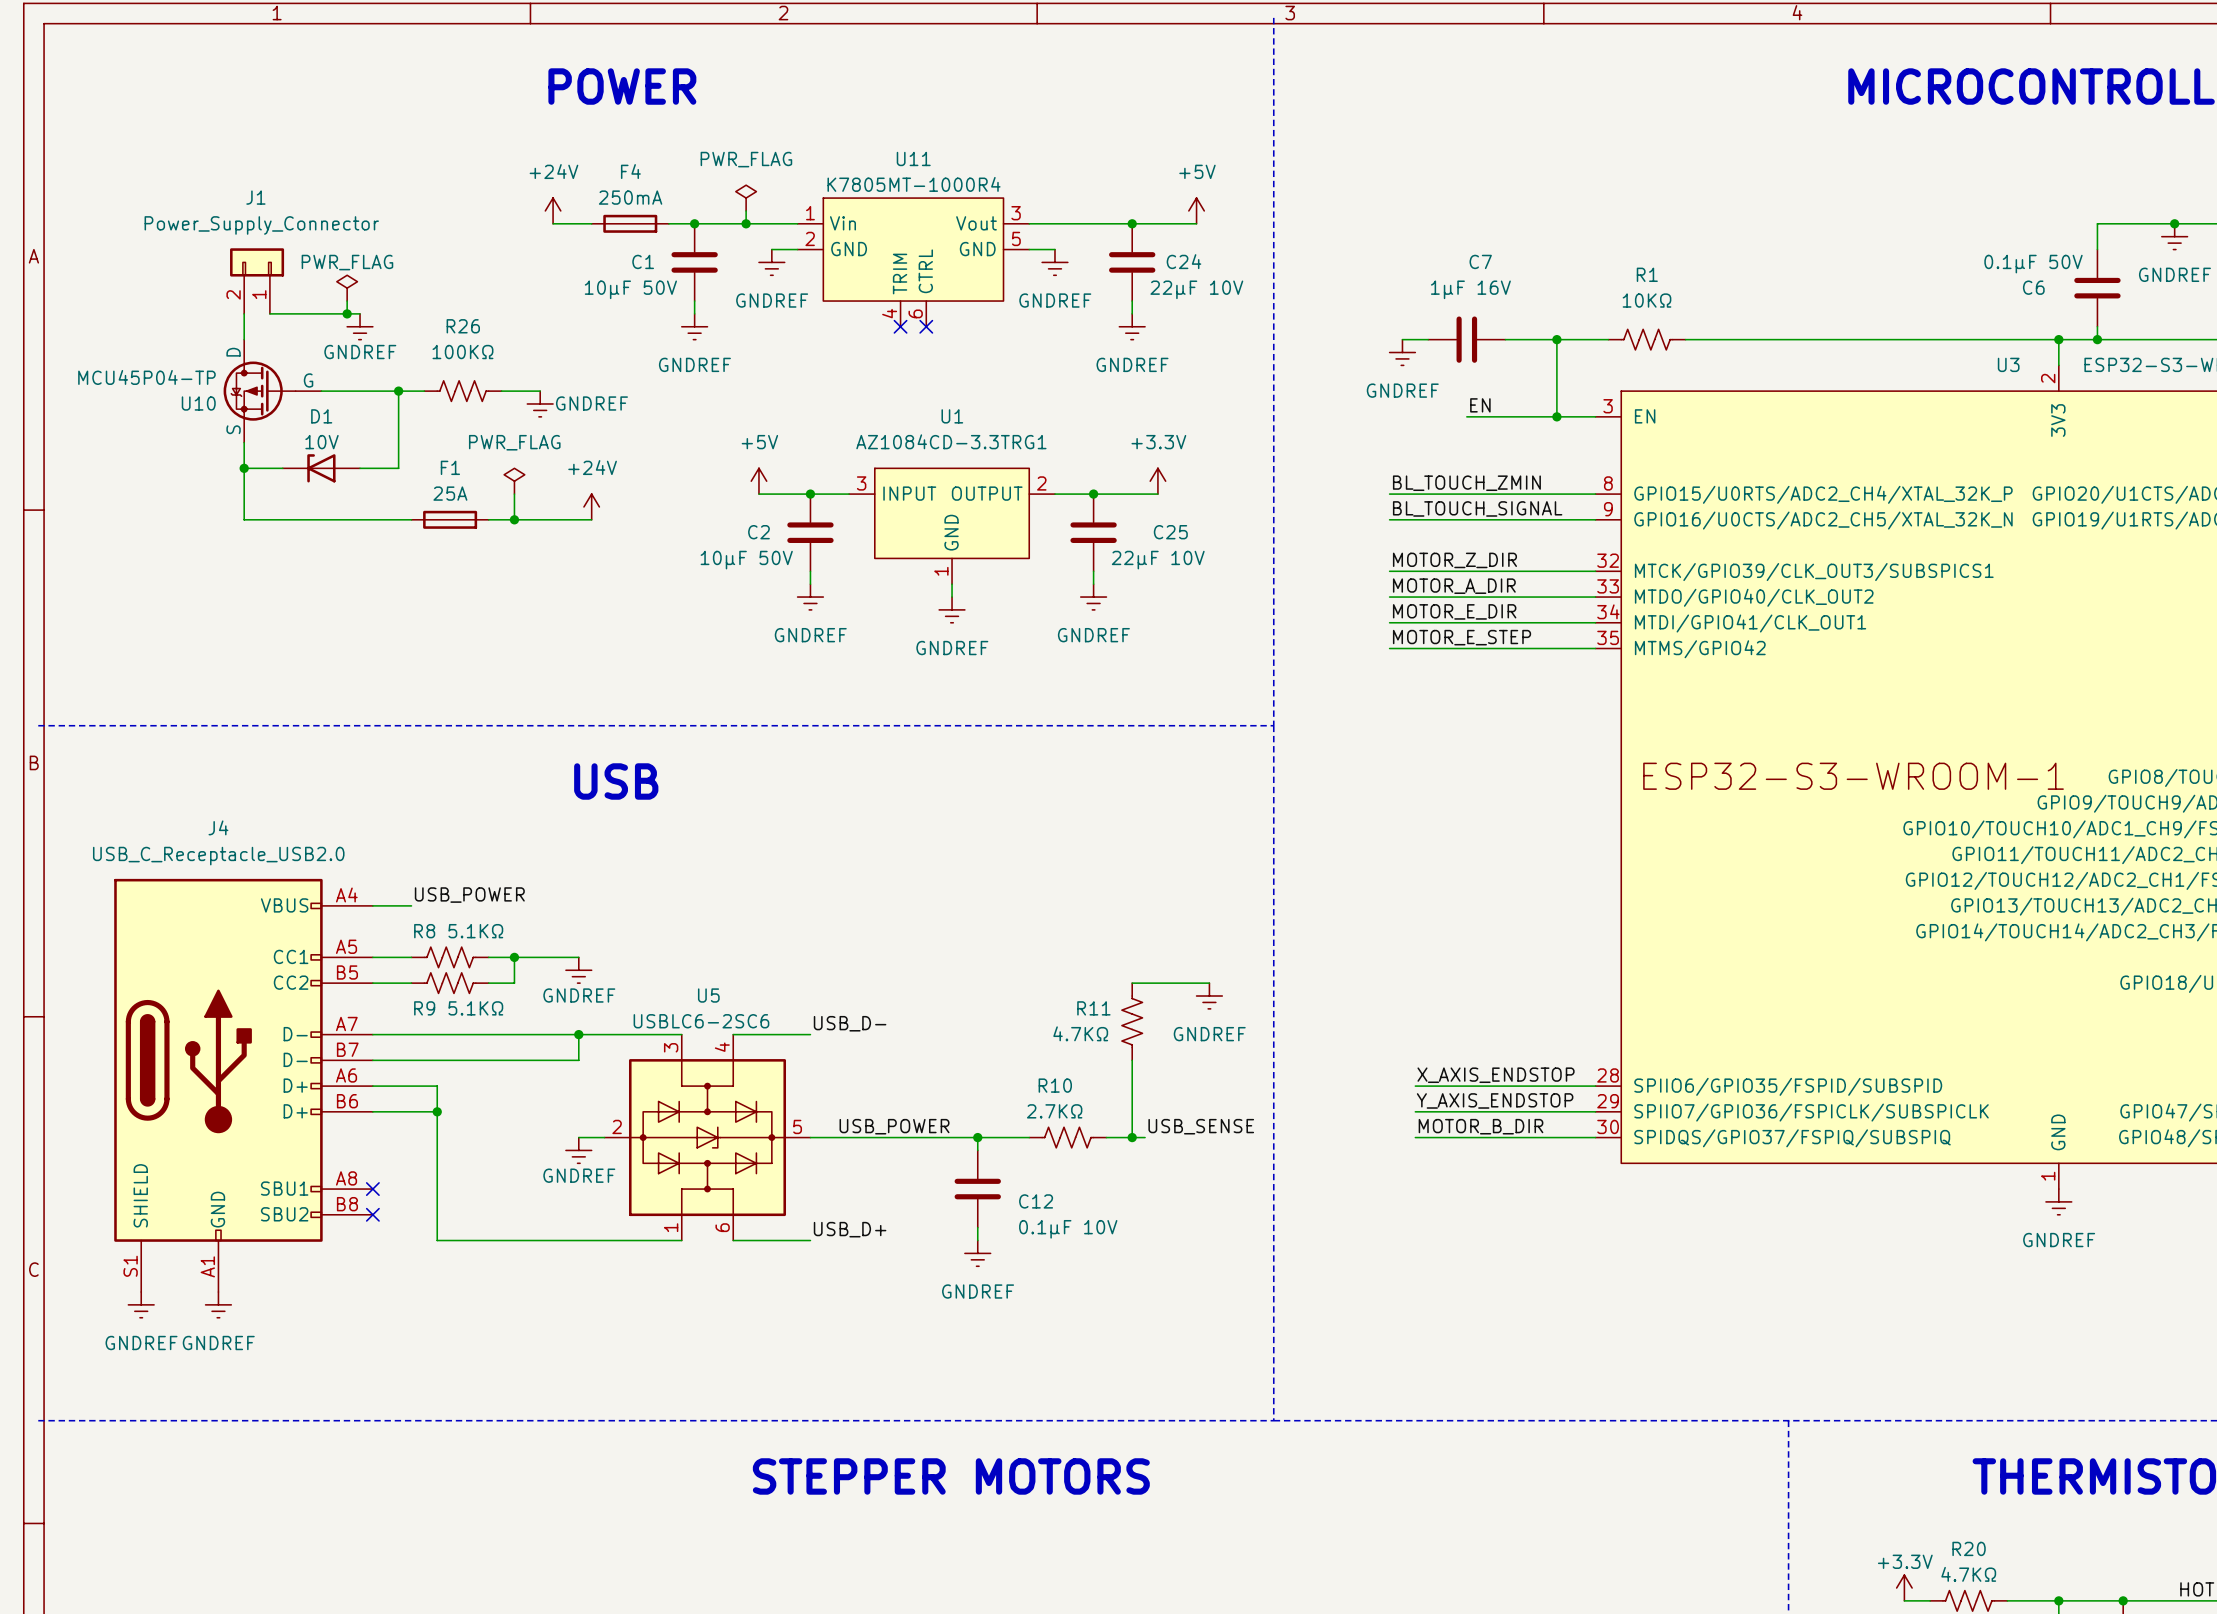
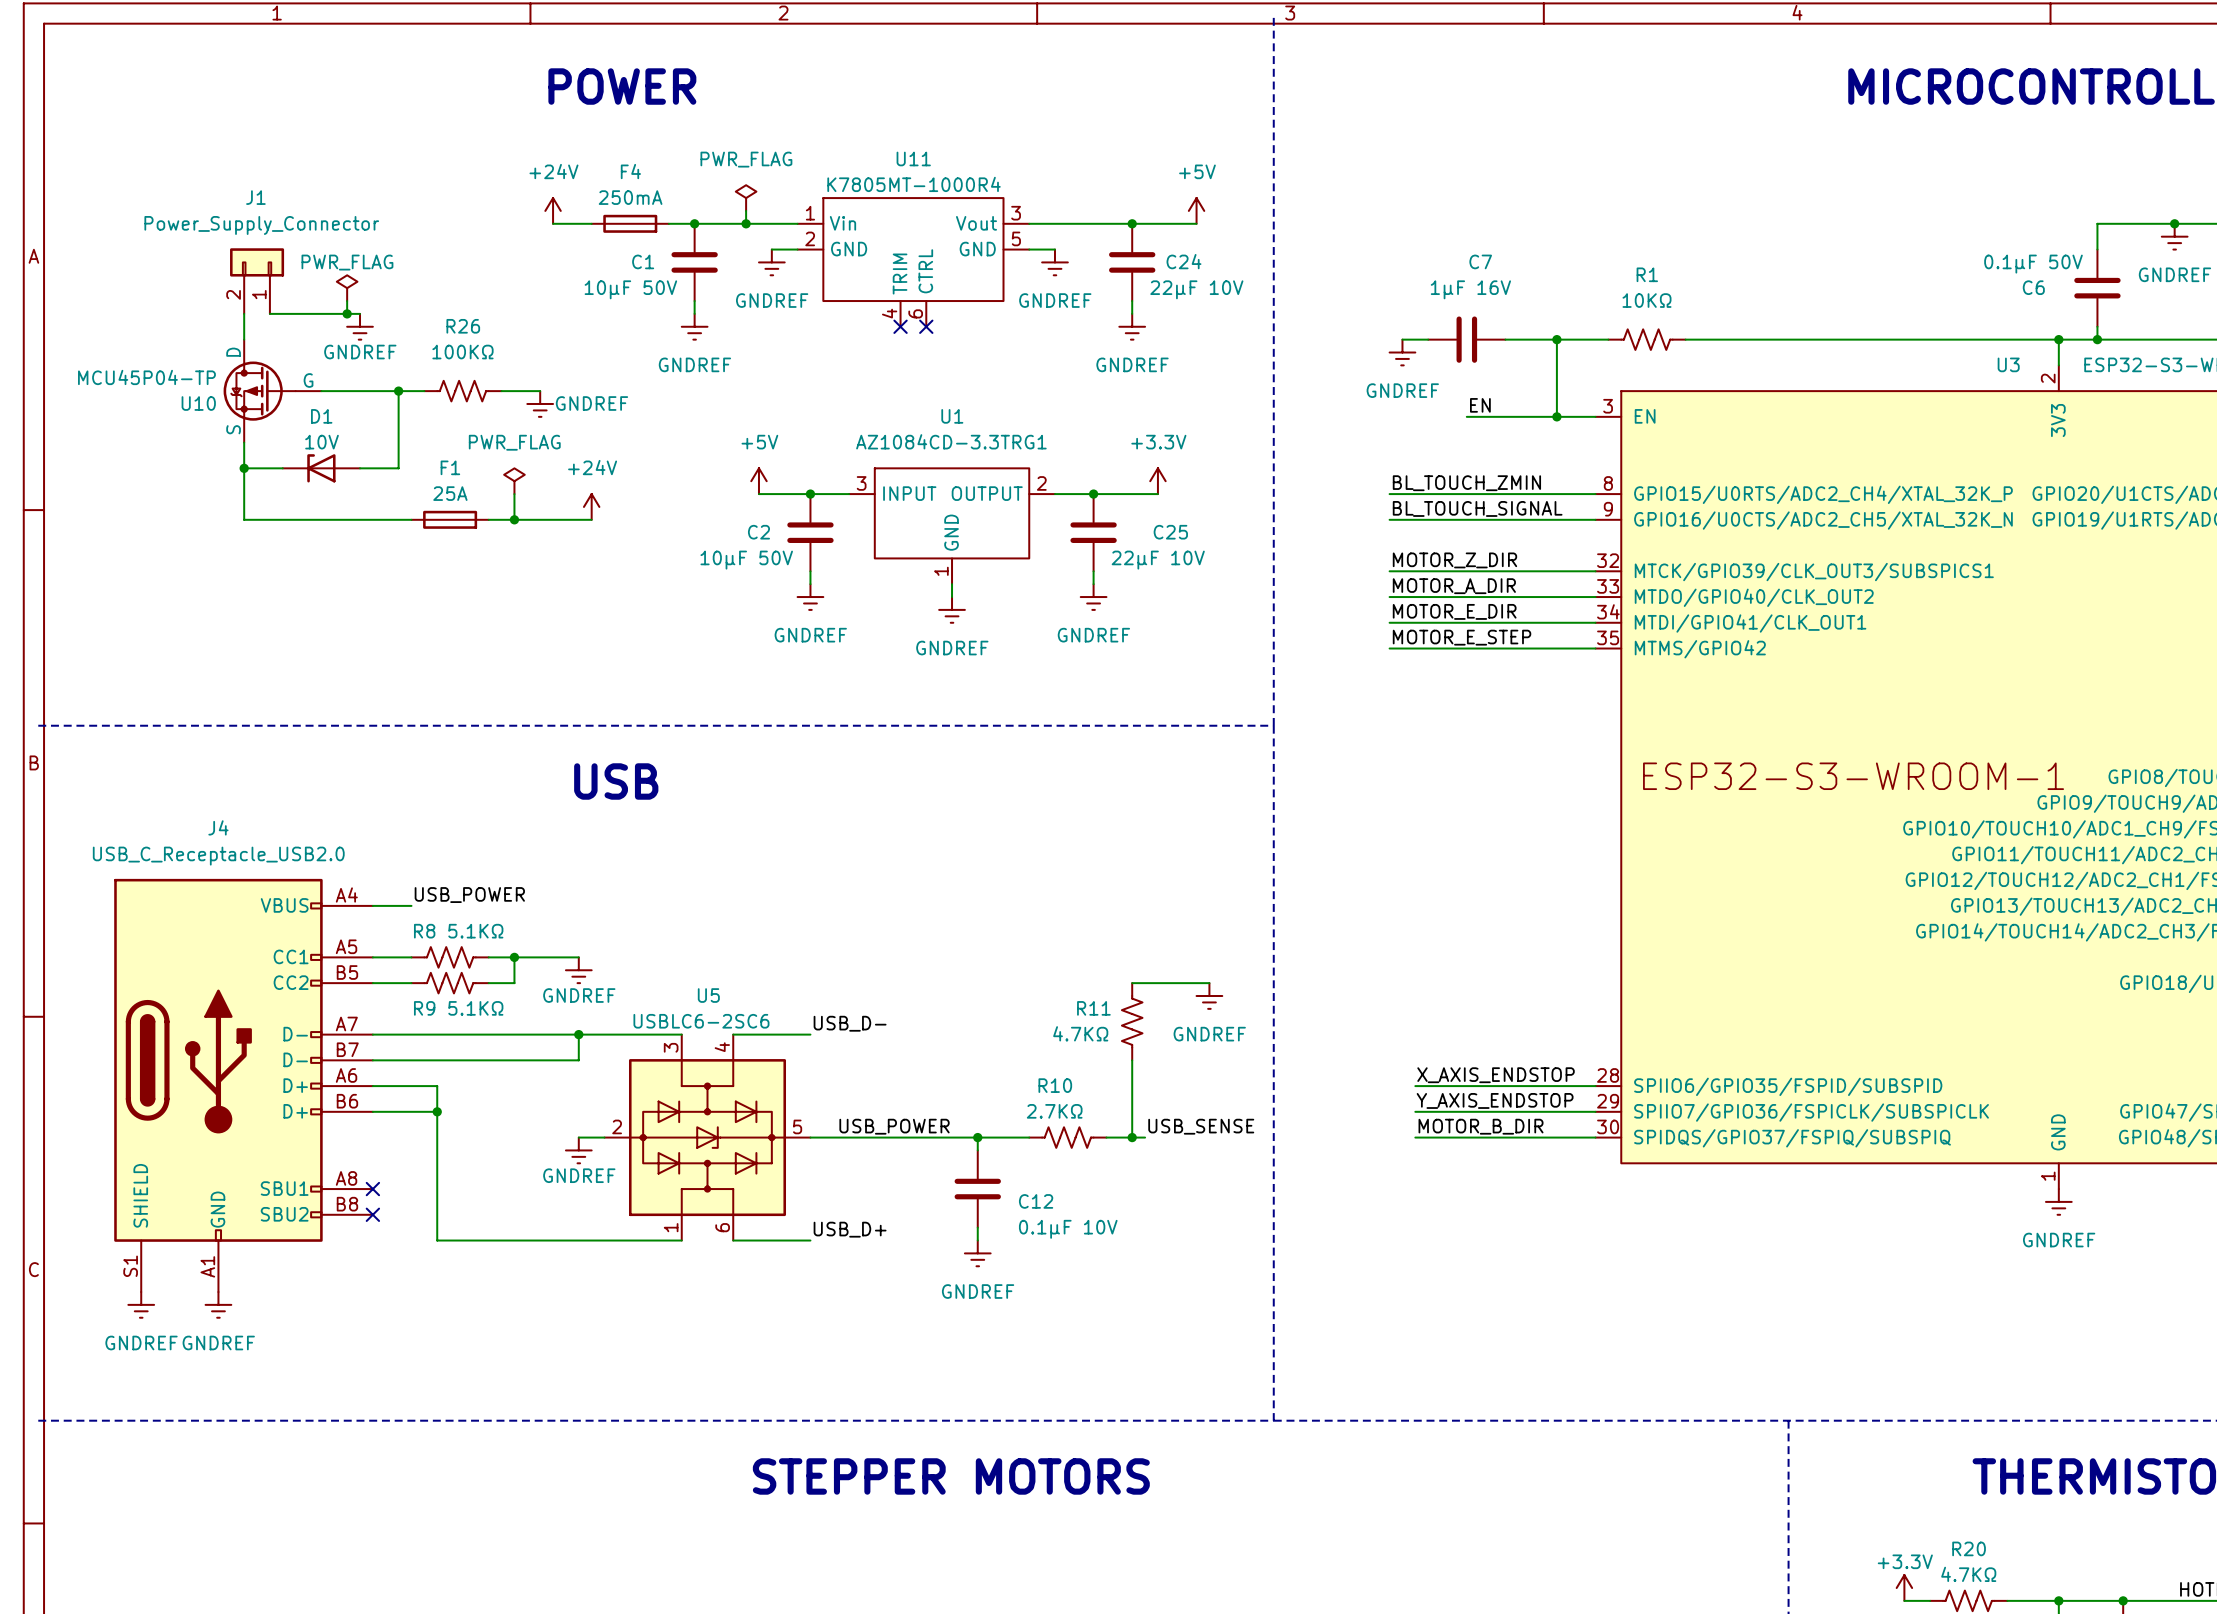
U11 symbol: [797, 198, 1030, 327] -> [797, 198, 1030, 327]
U1 symbol: [849, 468, 1055, 585] -> [849, 468, 1055, 585]

